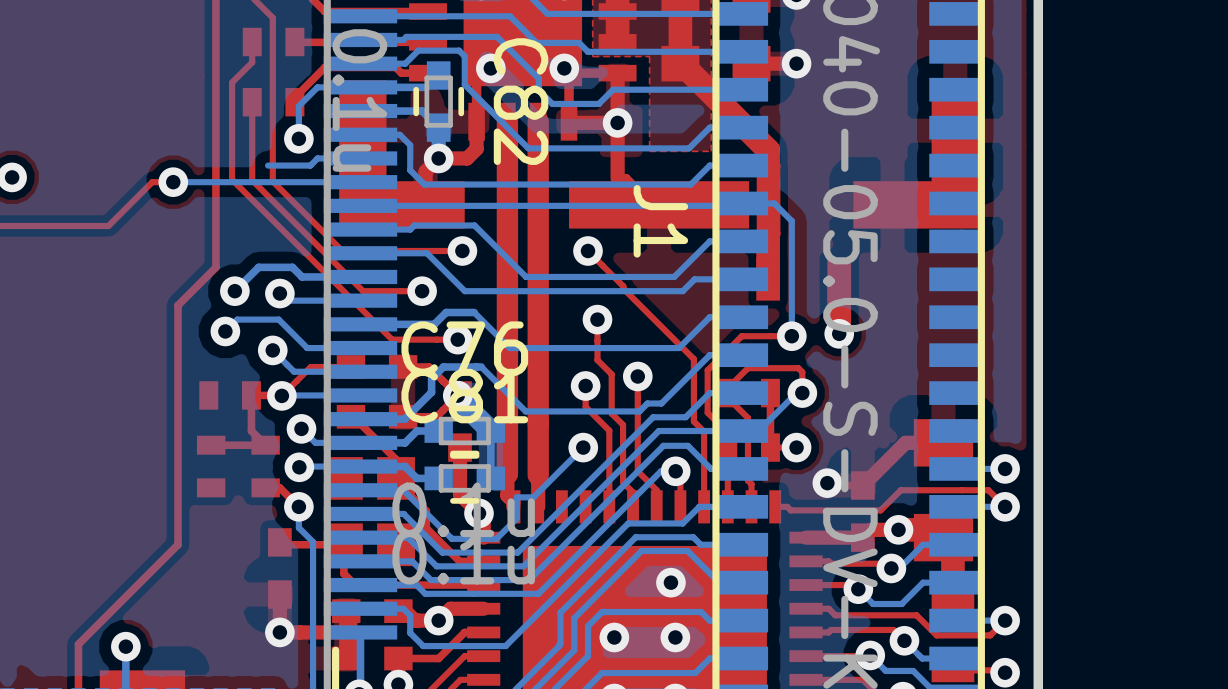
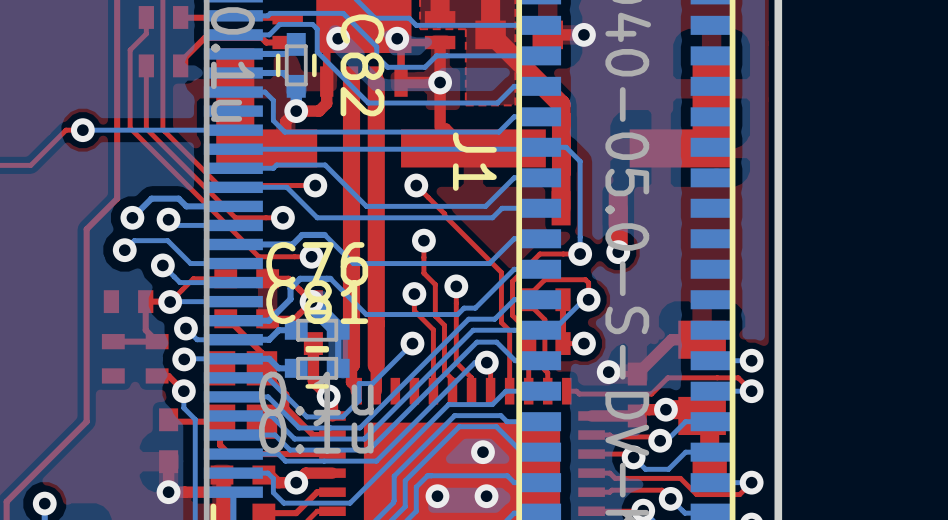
bottom track: (360, 87) (317, 87) (298, 106) (298, 138) -> none
via: (298, 138) -> none
bottom track: (360, 158) (317, 158) (310, 165) (268, 165) -> none

